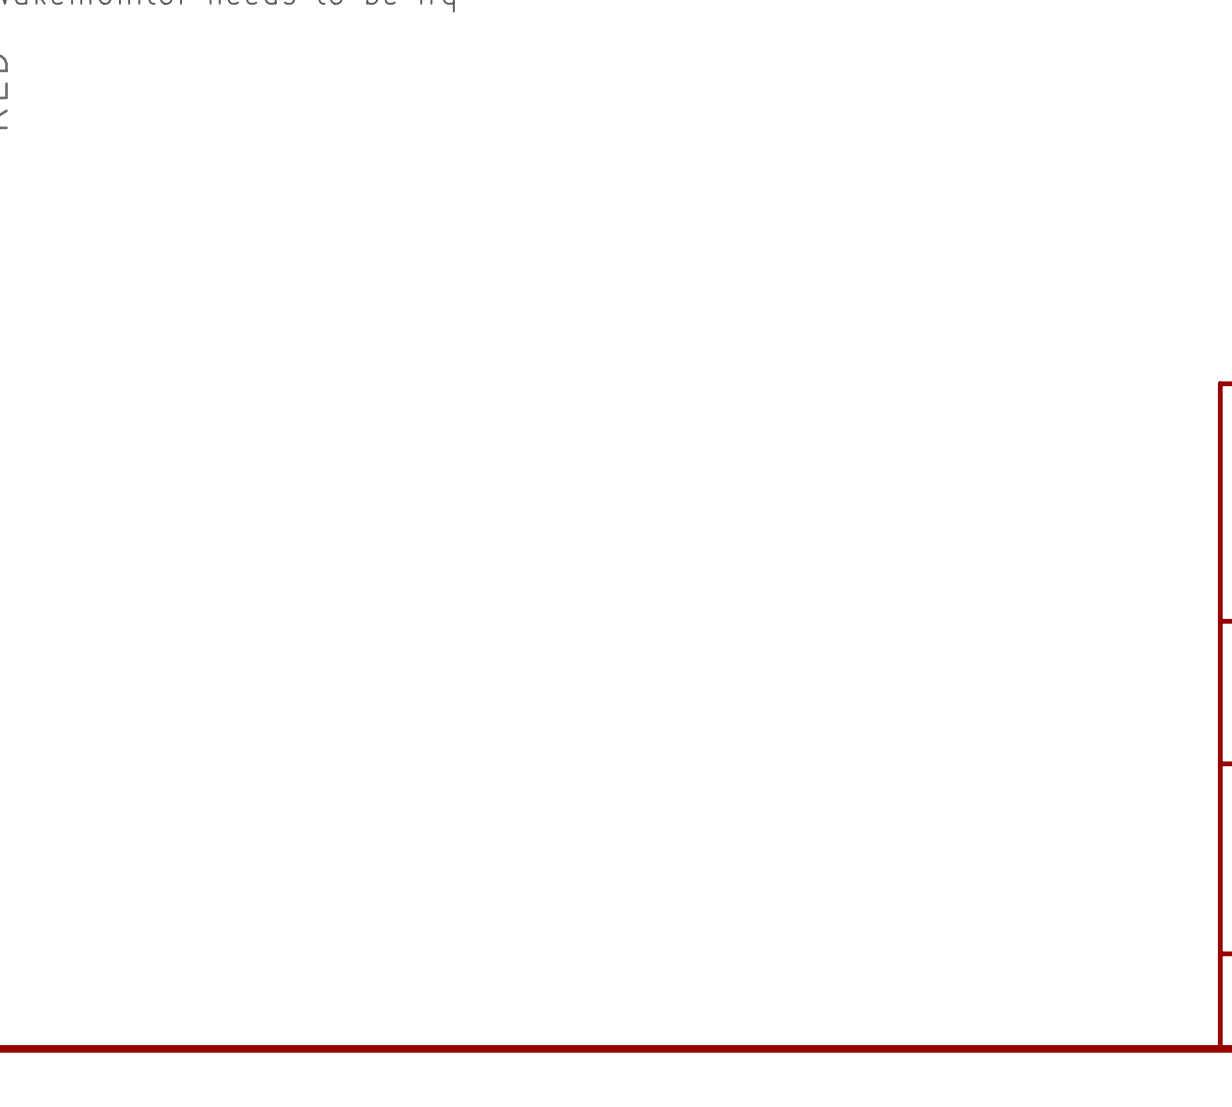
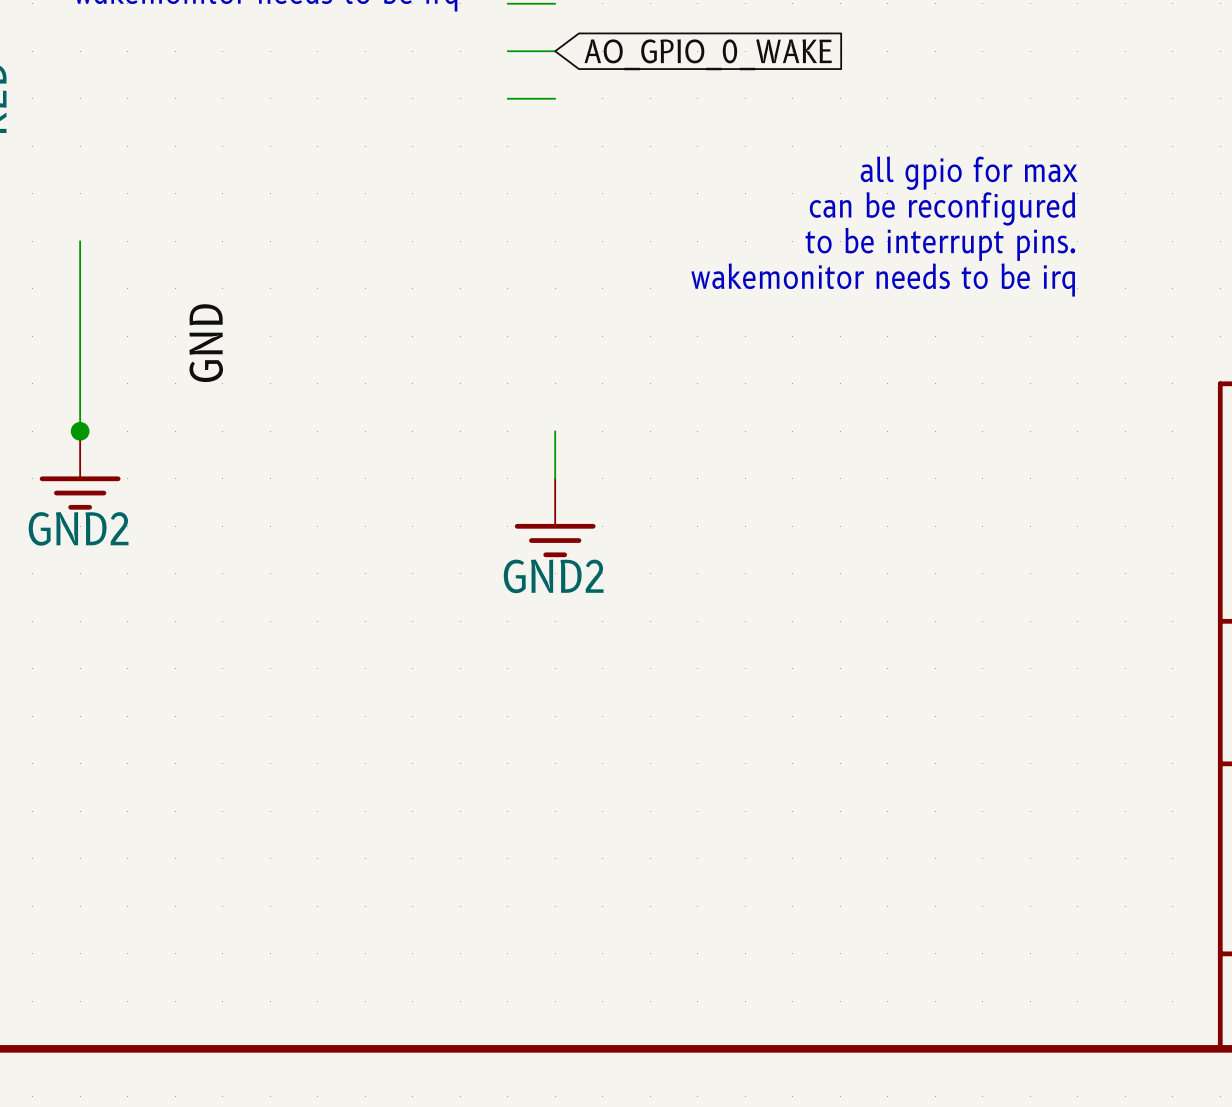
wire: none -> (507, 3) (555, 3)
wire: none -> (507, 51) (555, 51)
global label: none -> AO_GPIO_0_WAKE (708, 54)
wire: none -> (507, 98) (555, 98)
text: none -> all gpio for max (969, 173)
text: none -> can be reconfigured (942, 208)
wire: none -> (80, 241) (80, 431)
text: none -> to be interrupt pins. (940, 244)
text: none -> wakemonitor needs to be irq (883, 280)
label: none -> GND (206, 343)
junction: none -> (80, 431)
wire: none -> (555, 431) (555, 478)
power symbol: none -> GND2 (80, 470)
power symbol: none -> GND2 (555, 517)

